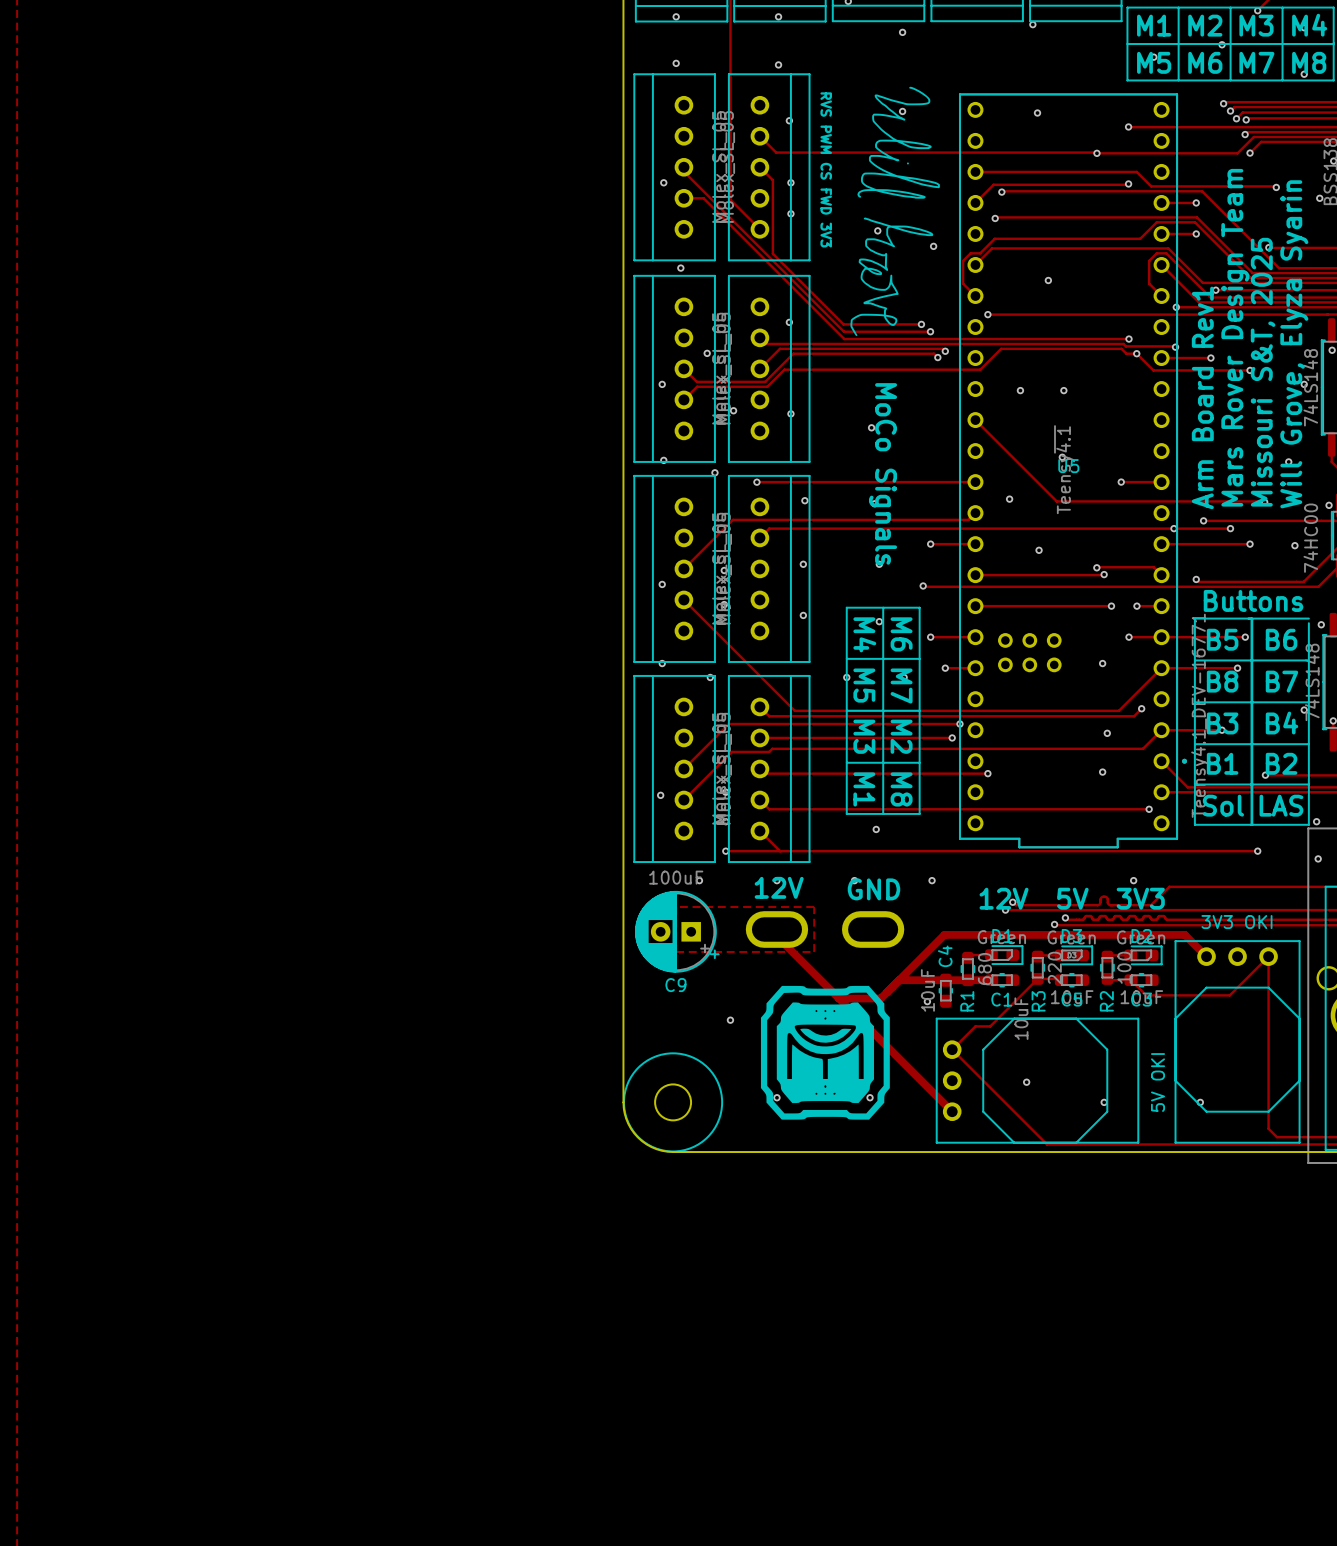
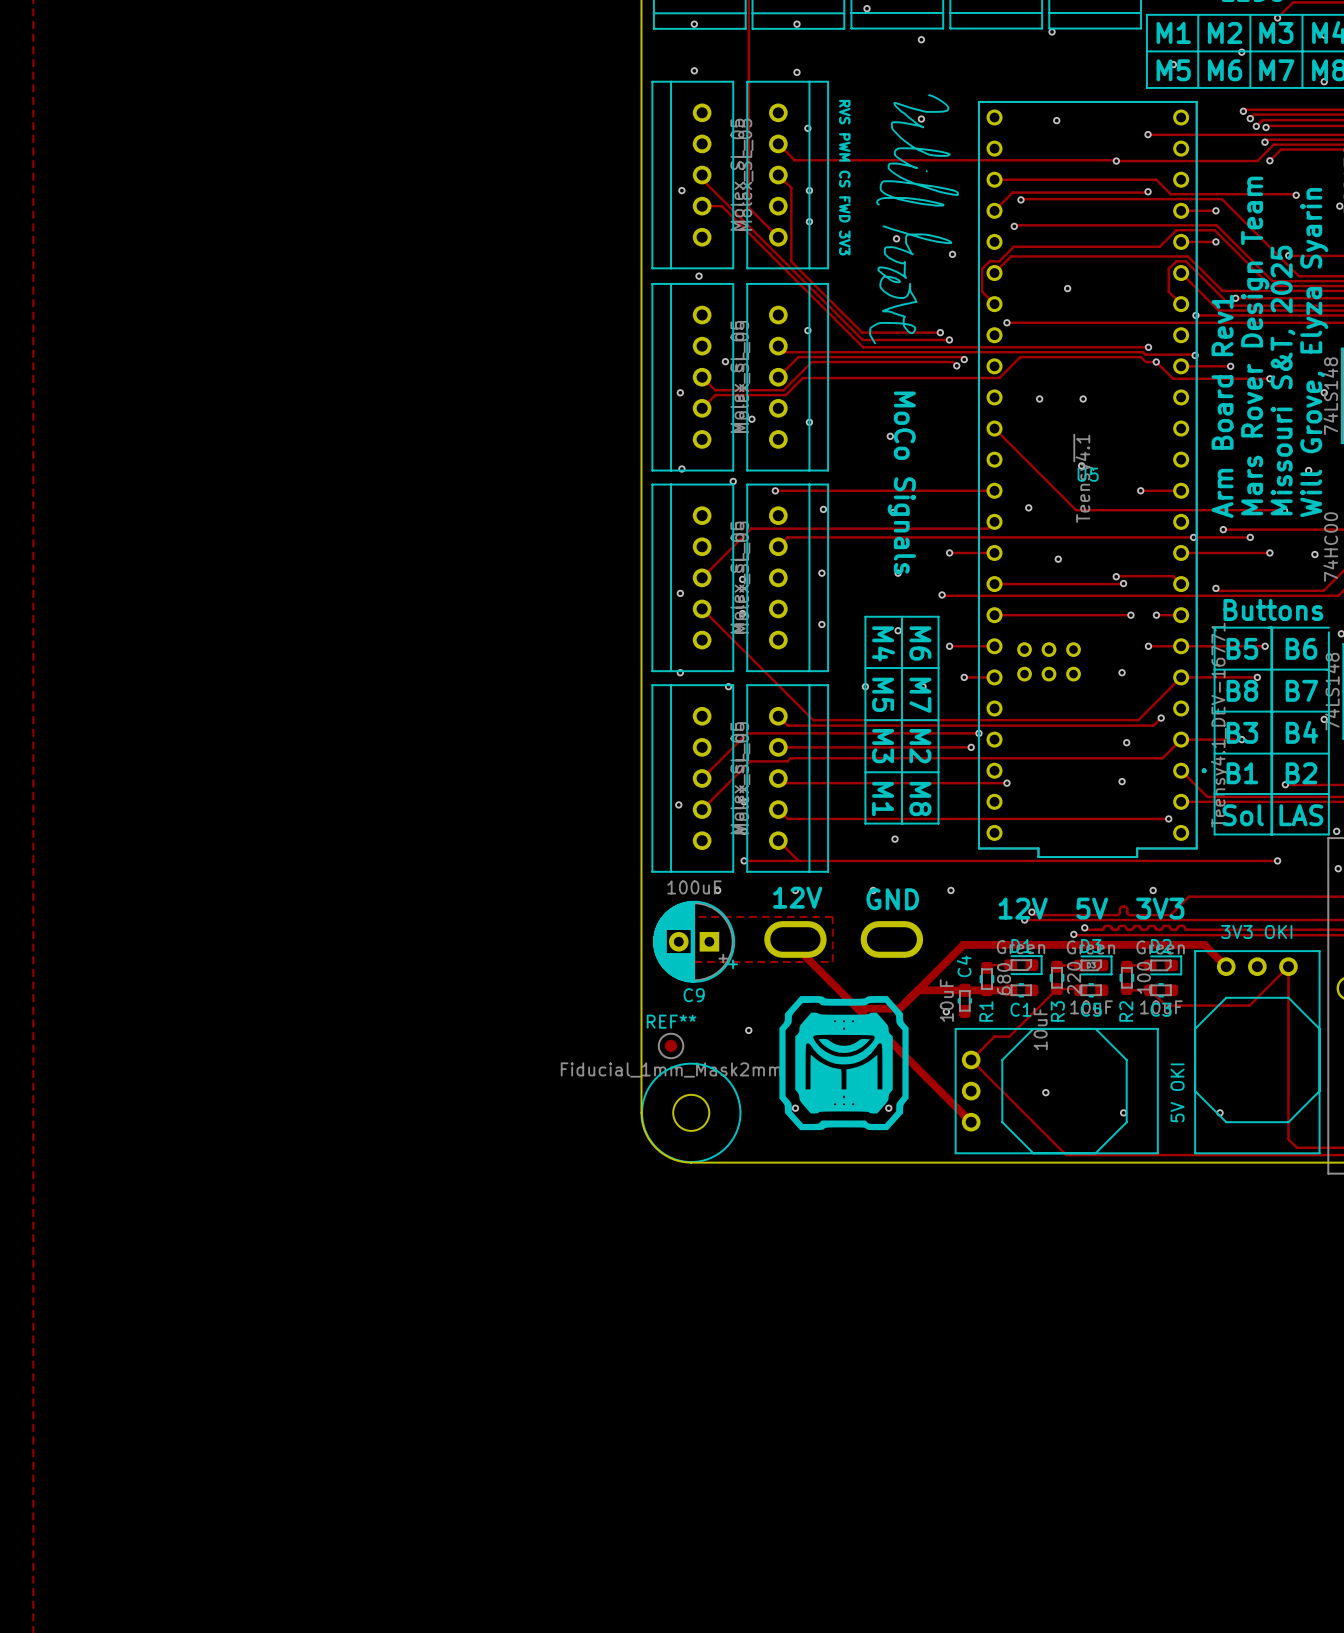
REF**: none -> Fiducial_1mm_Mask2mm (671, 1045)

